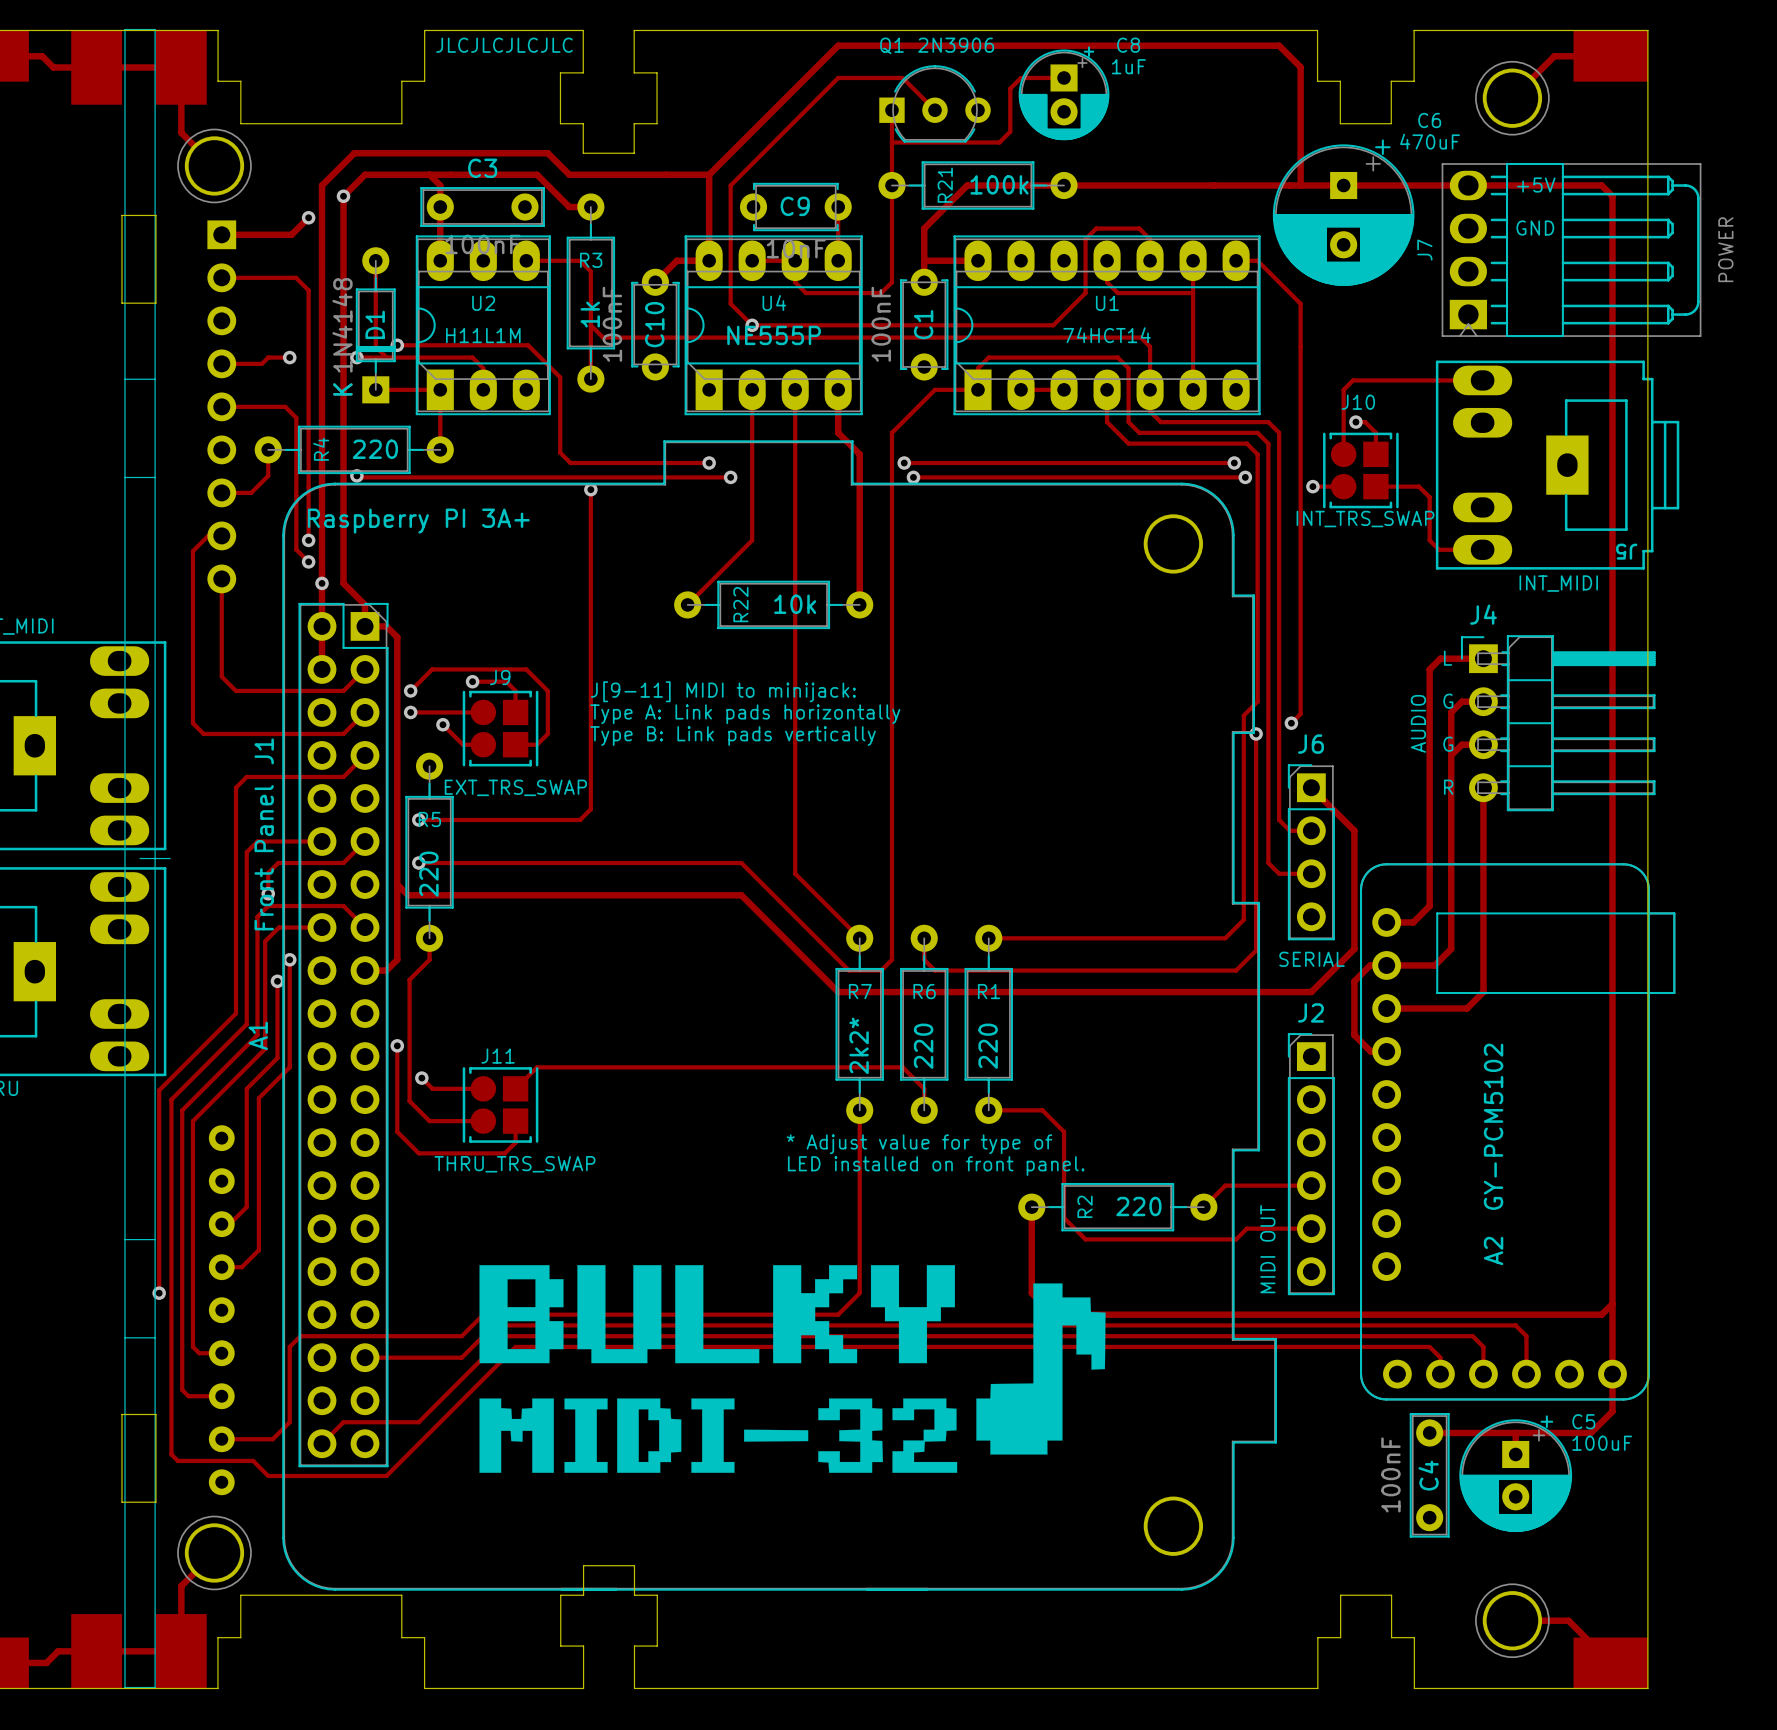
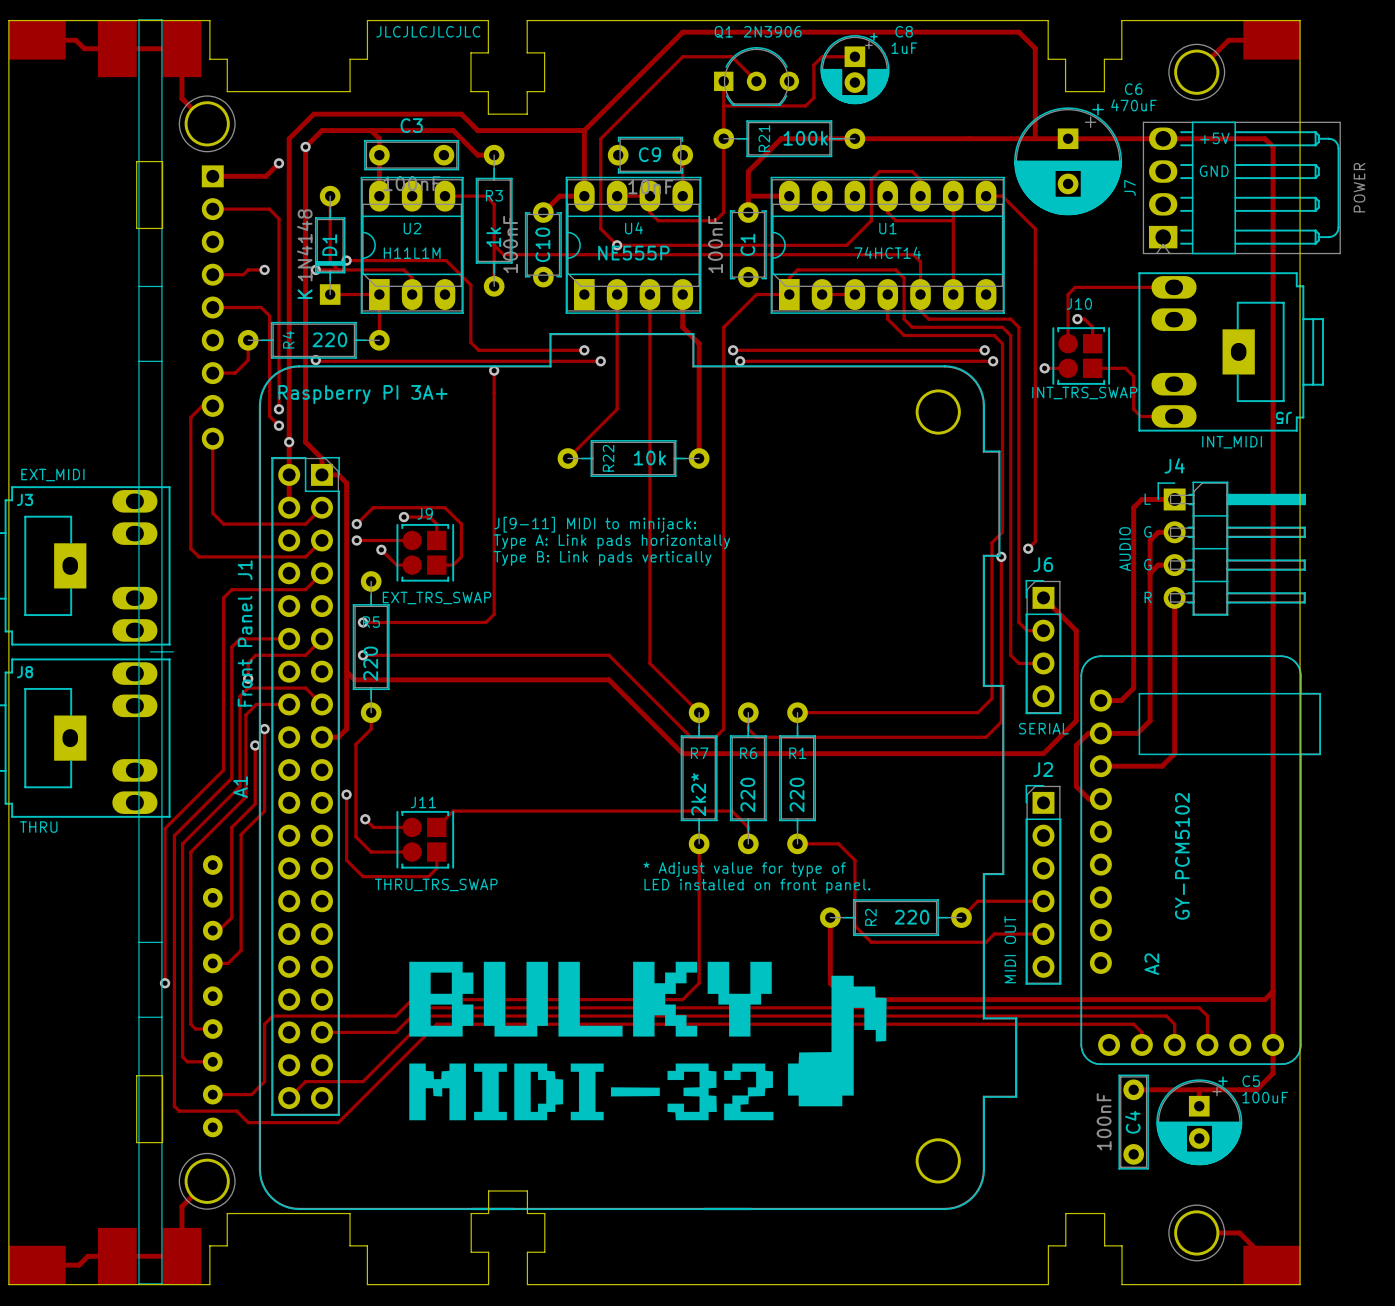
A2 name position: A2 (1493, 1250) -> A2 (1151, 964)

